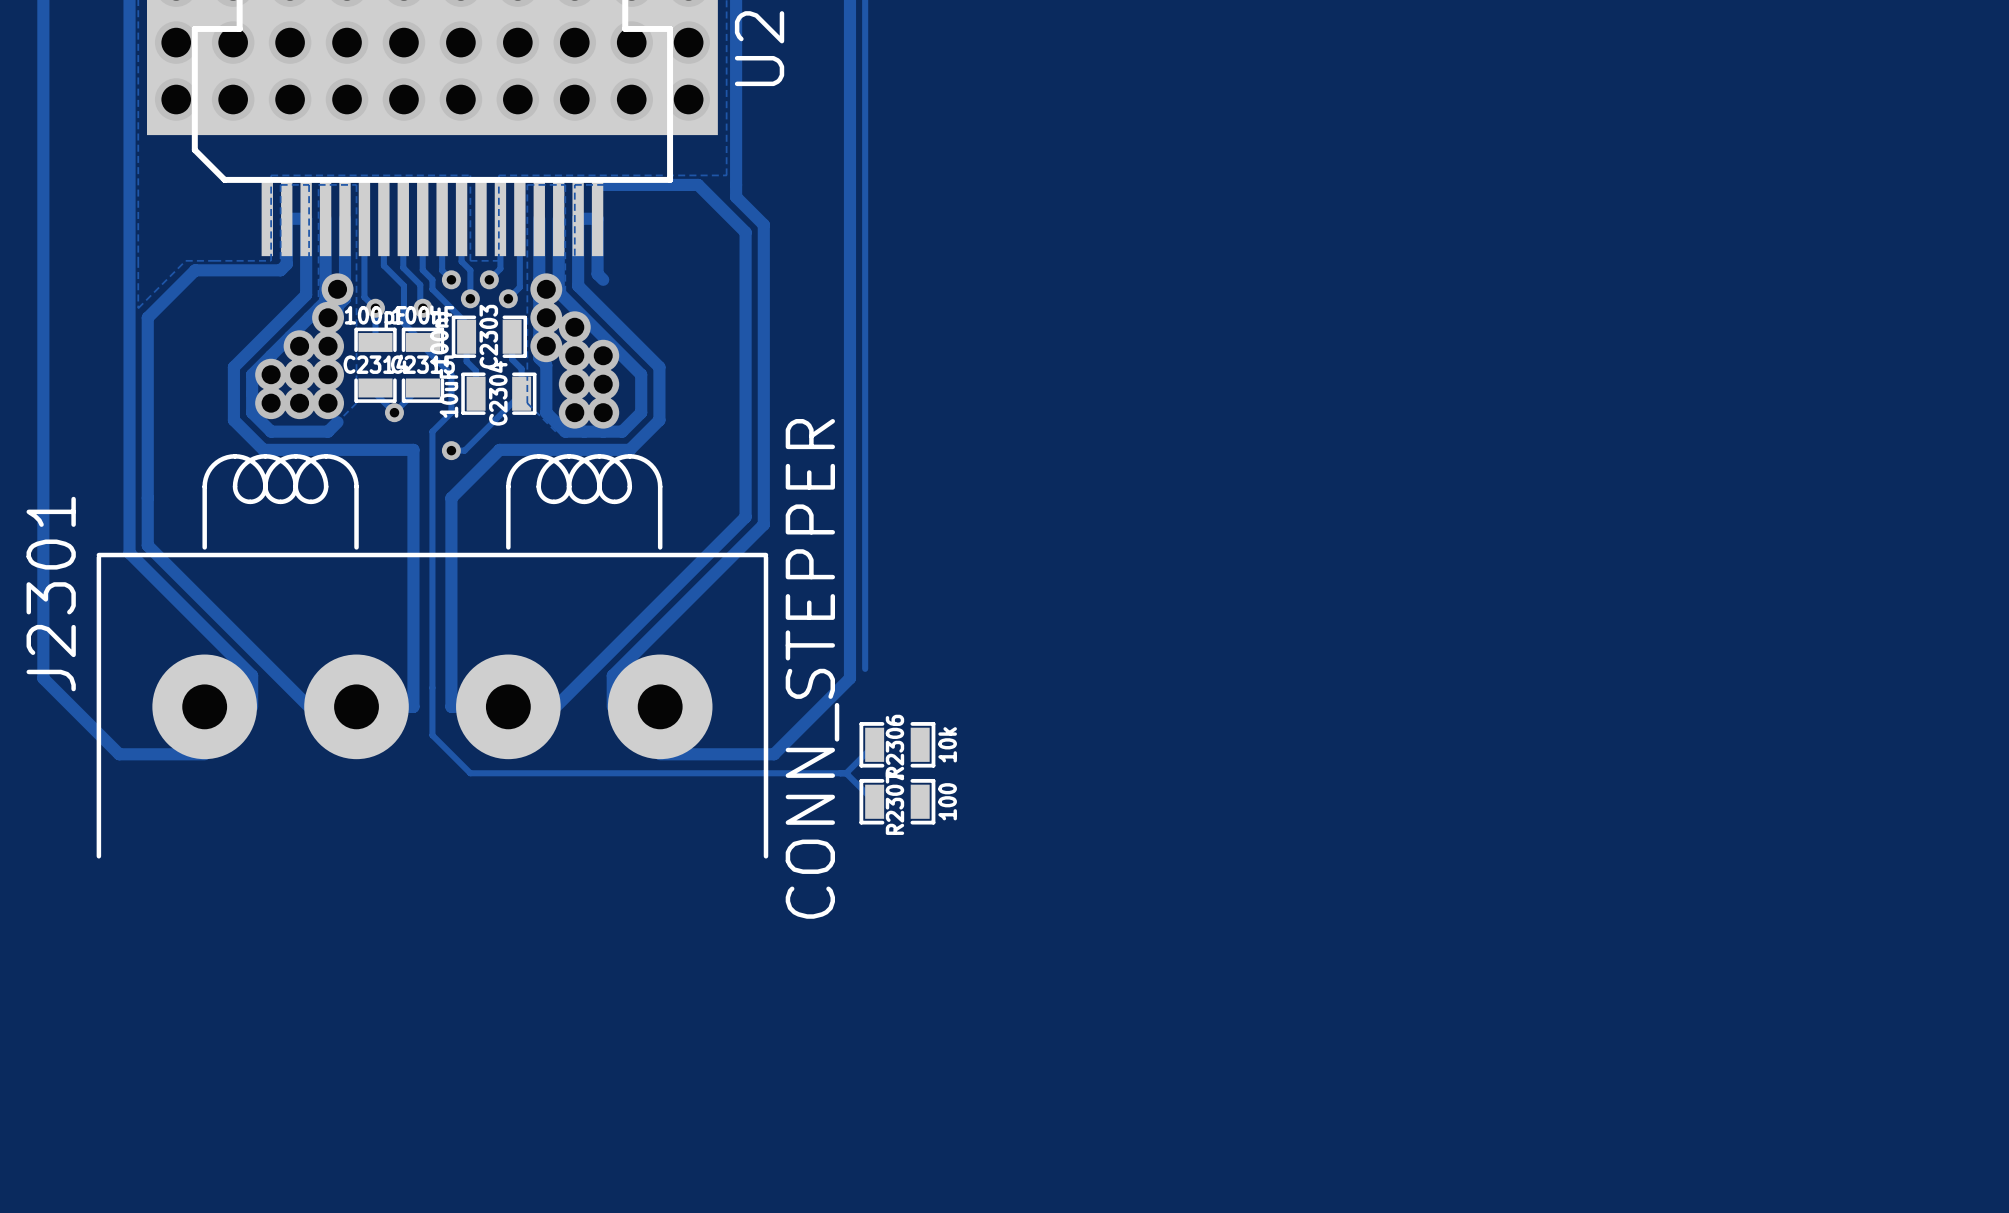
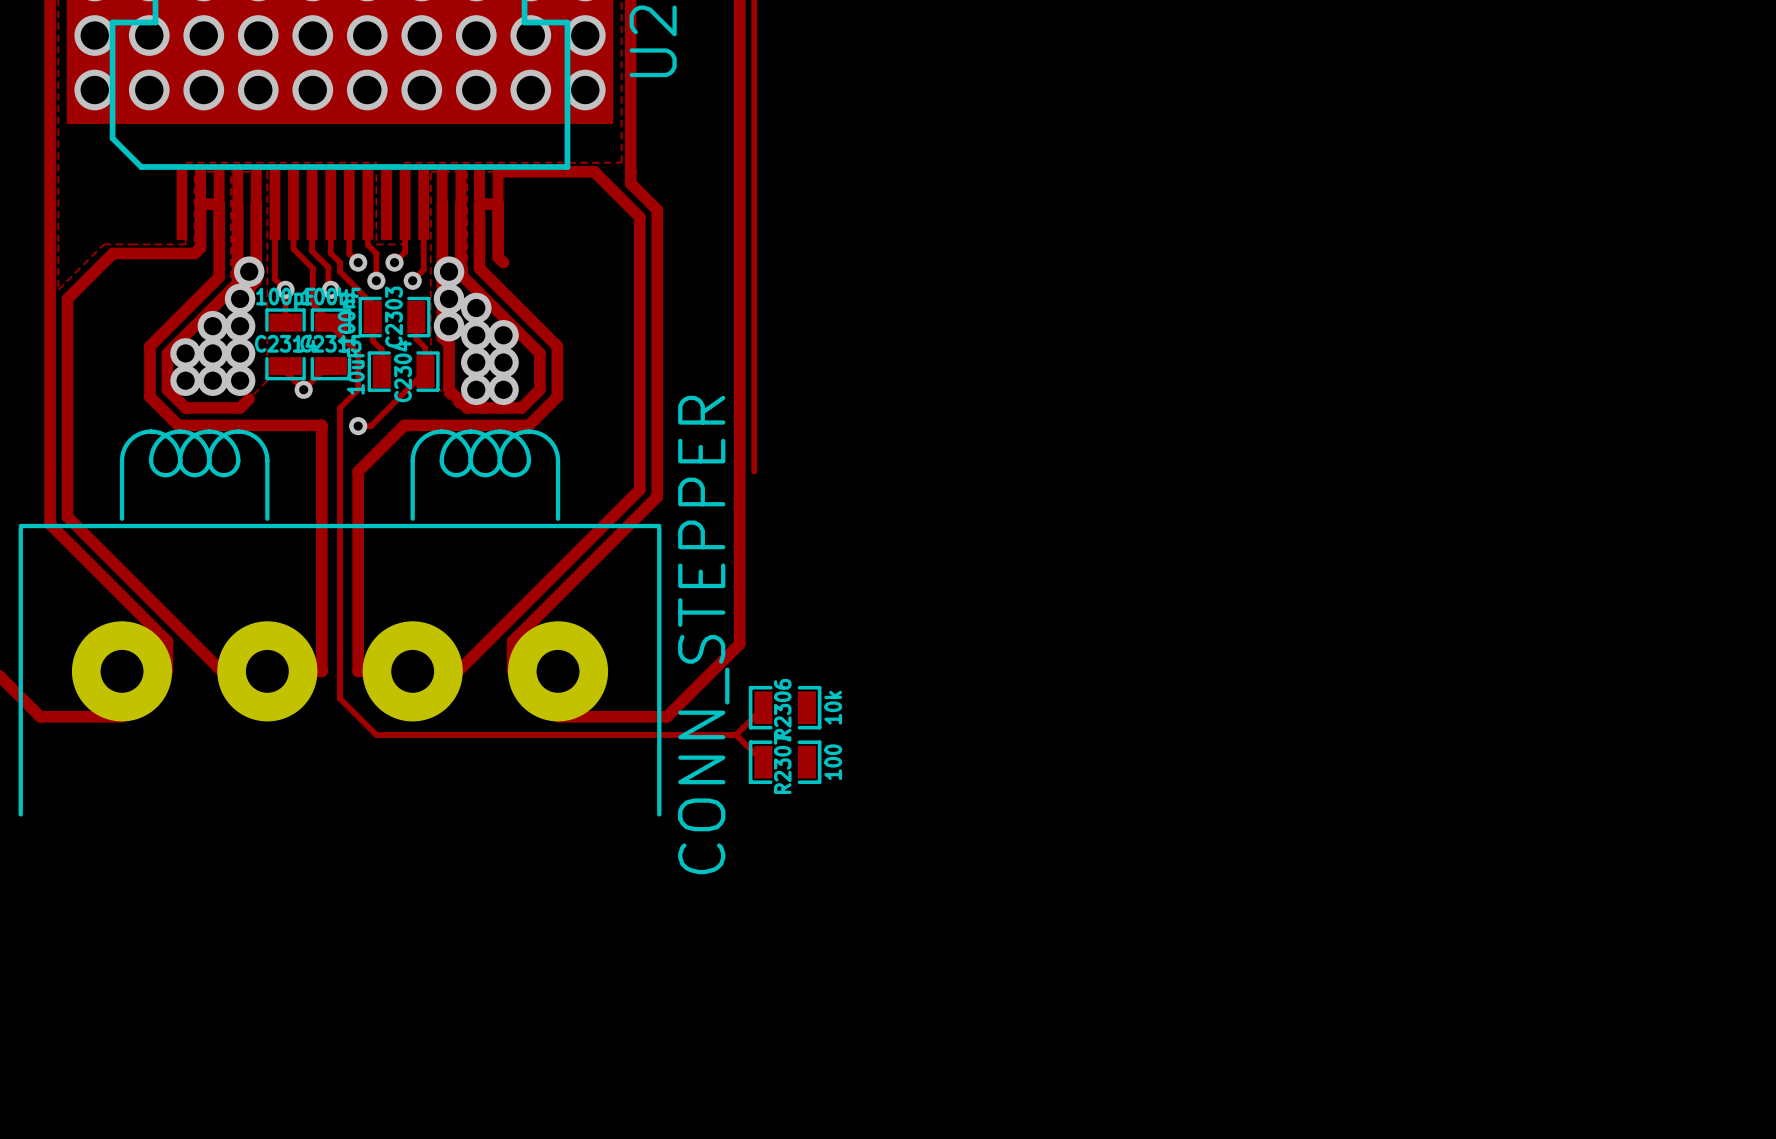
track: (865, 498) (865, 668) -> none

